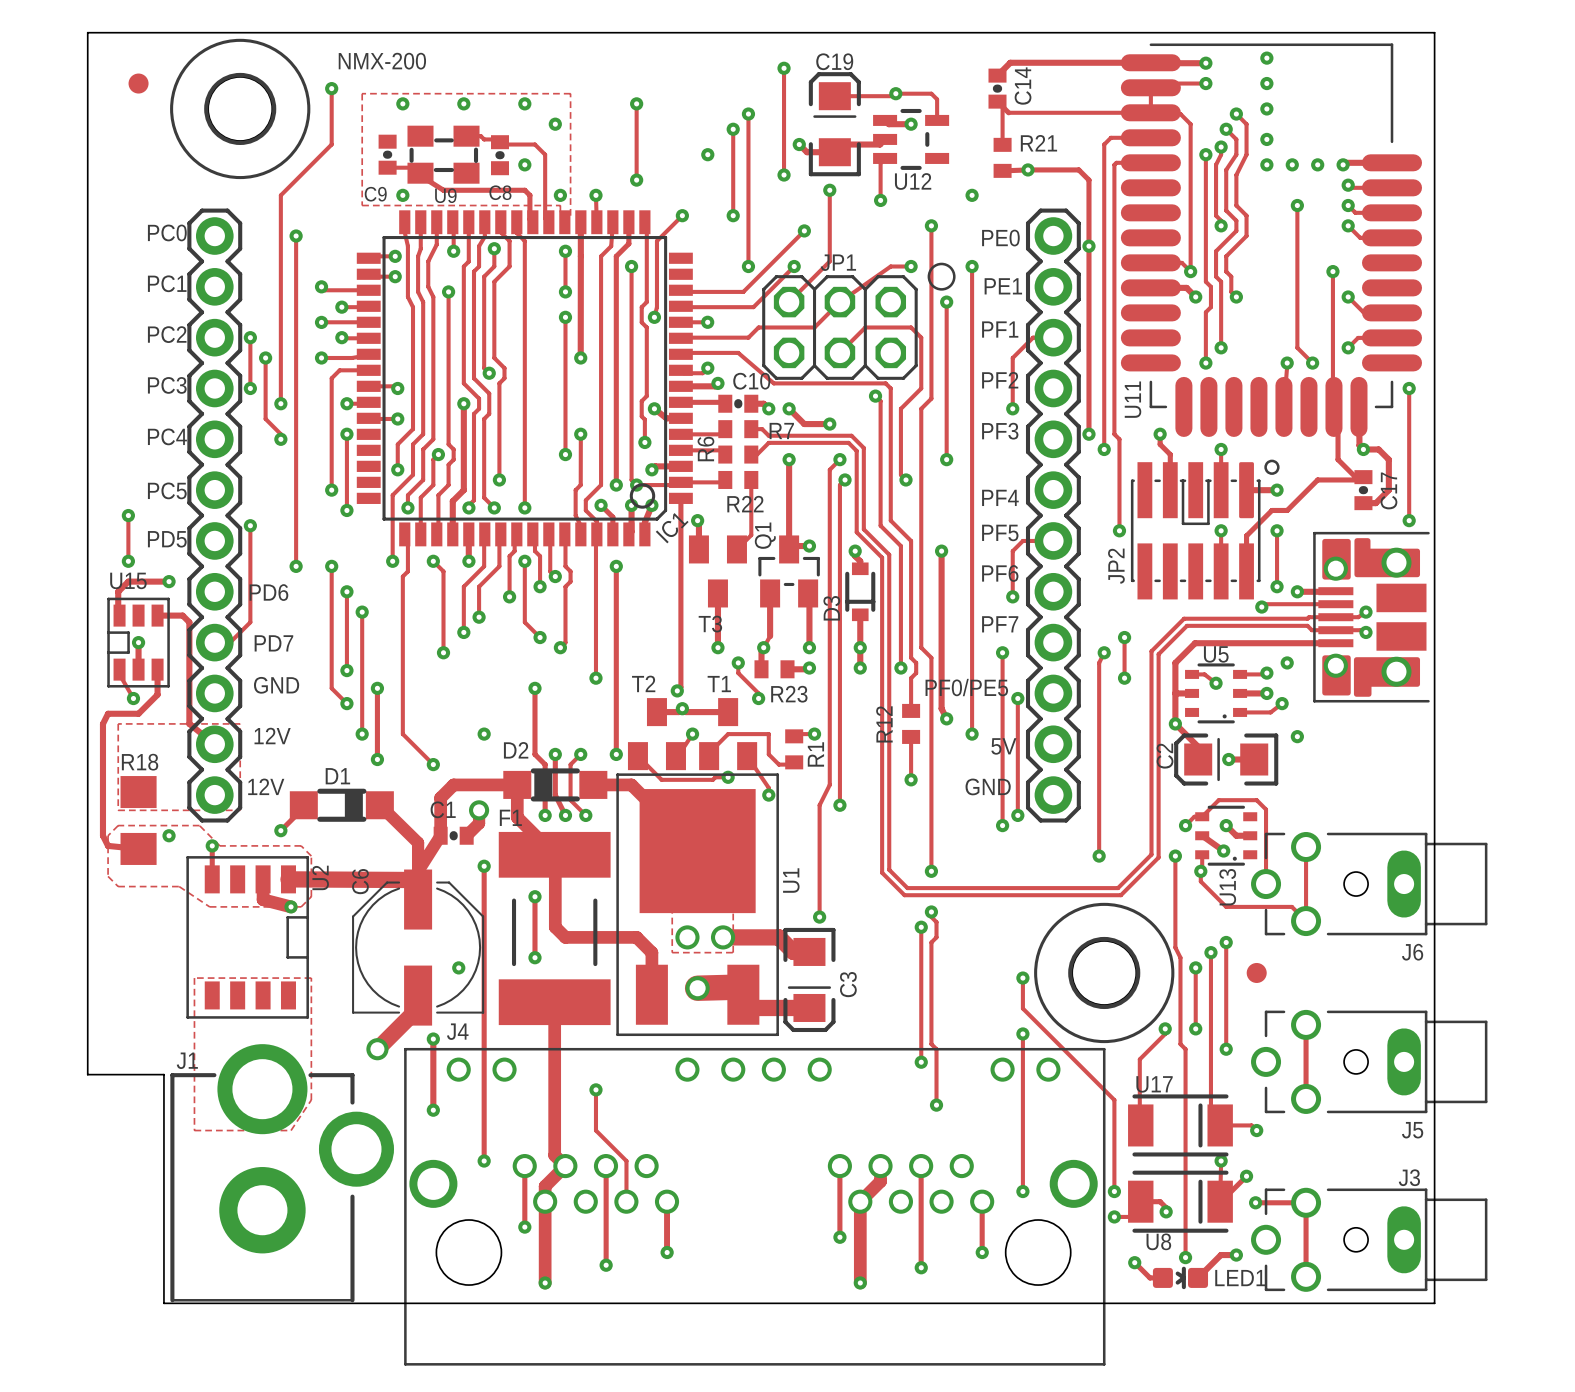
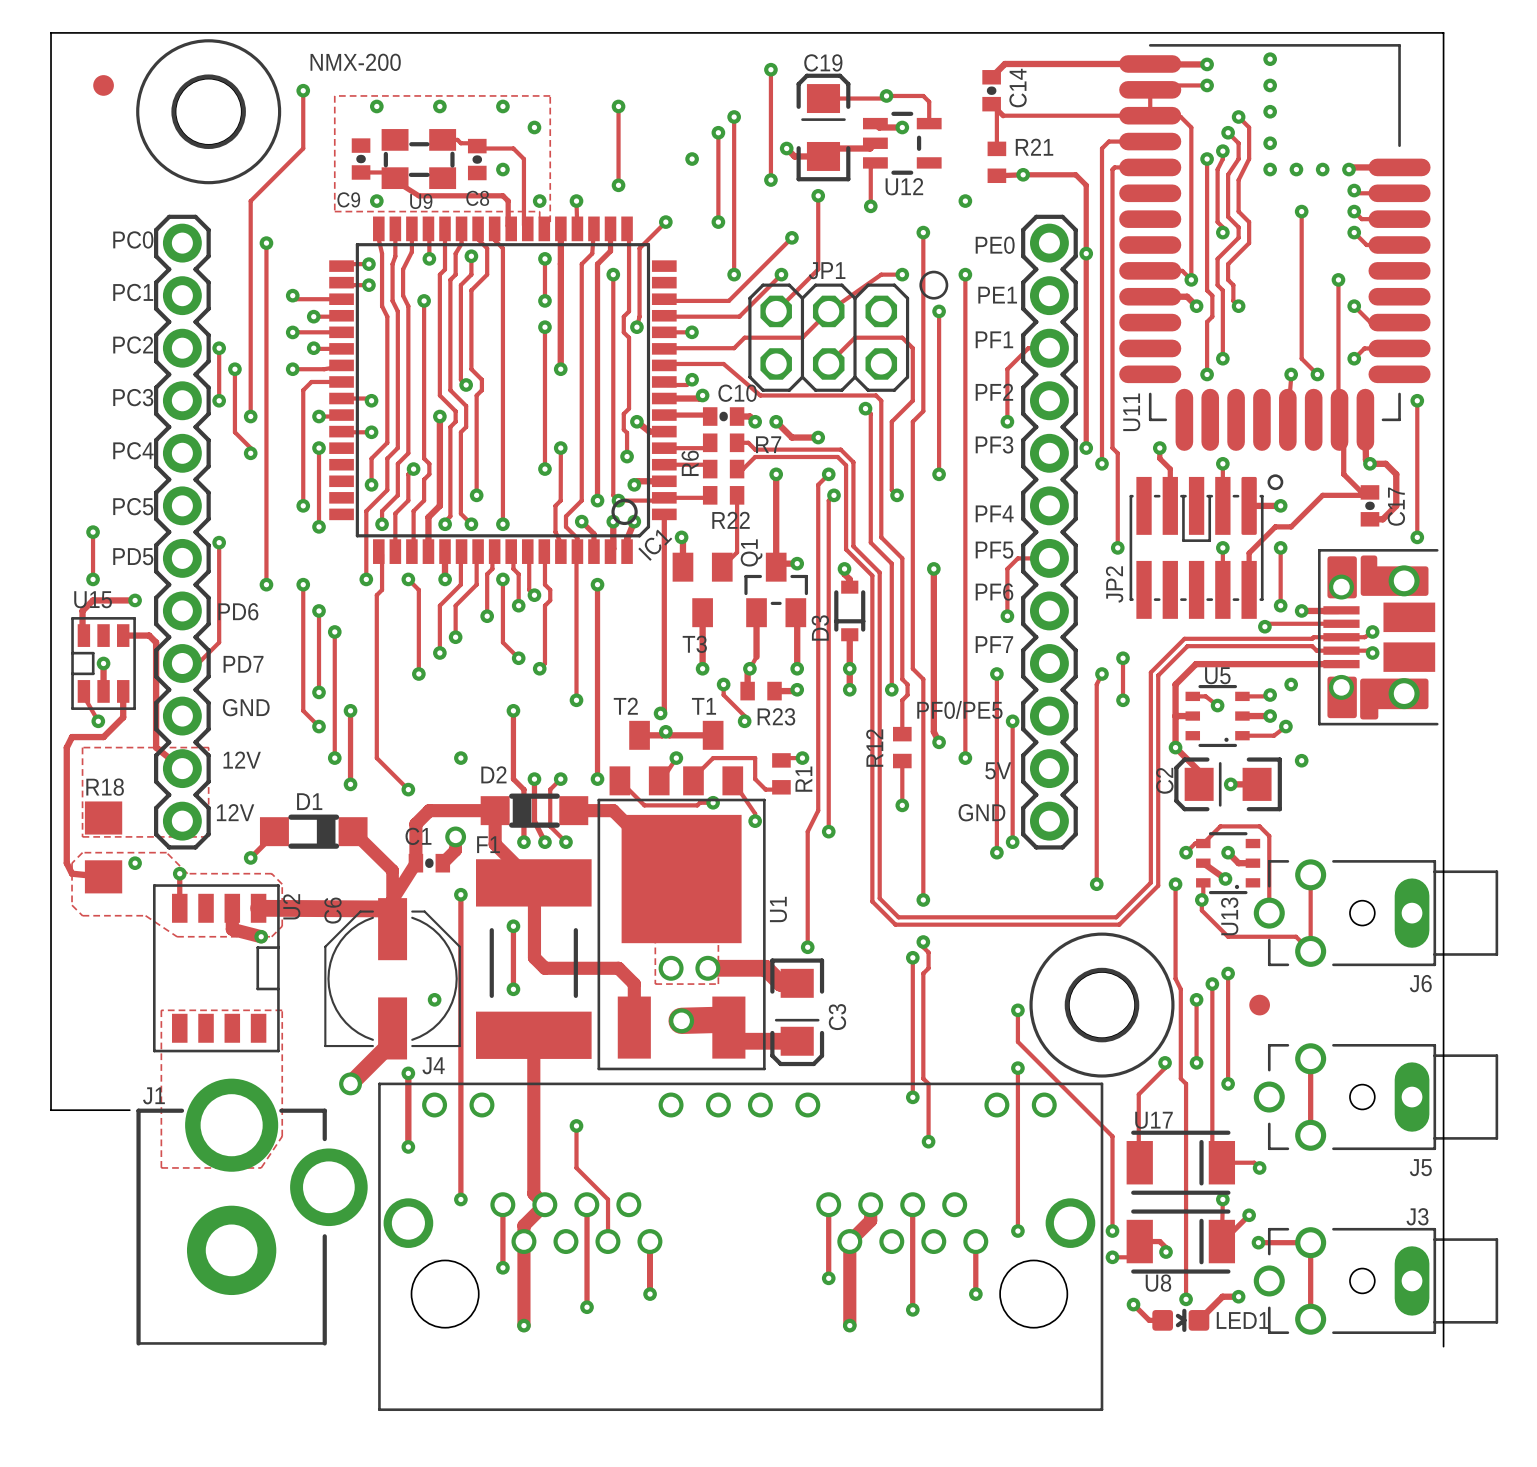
board edge: (163, 1074) (163, 1303) (1434, 1303) -> none

